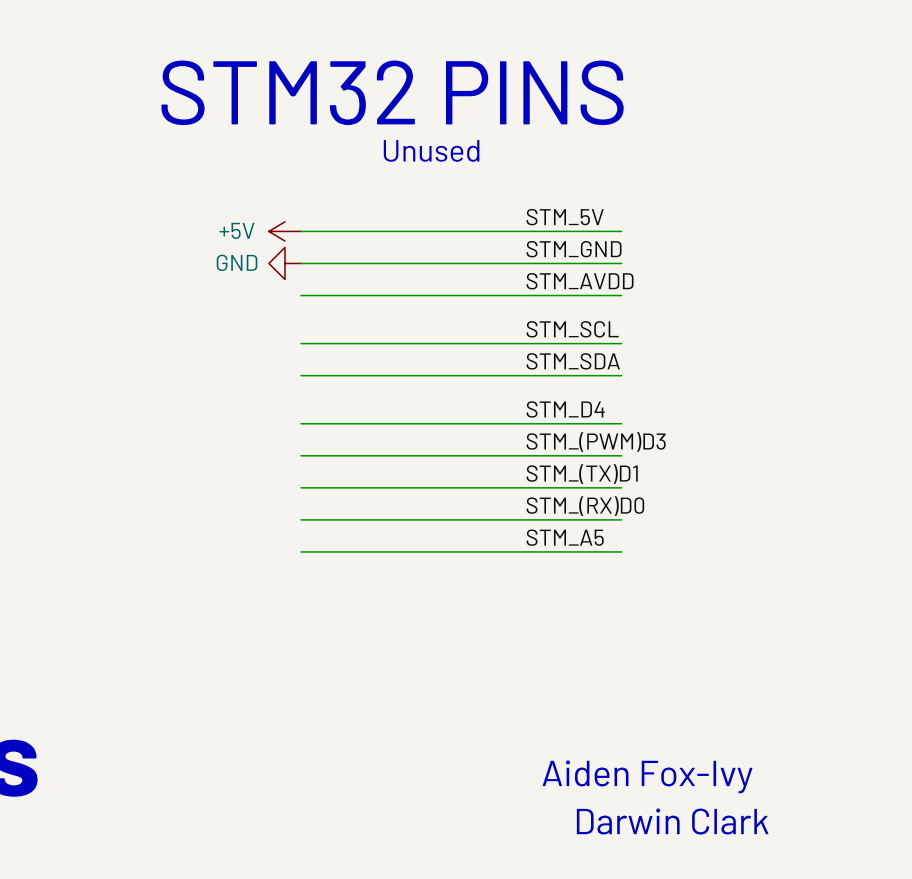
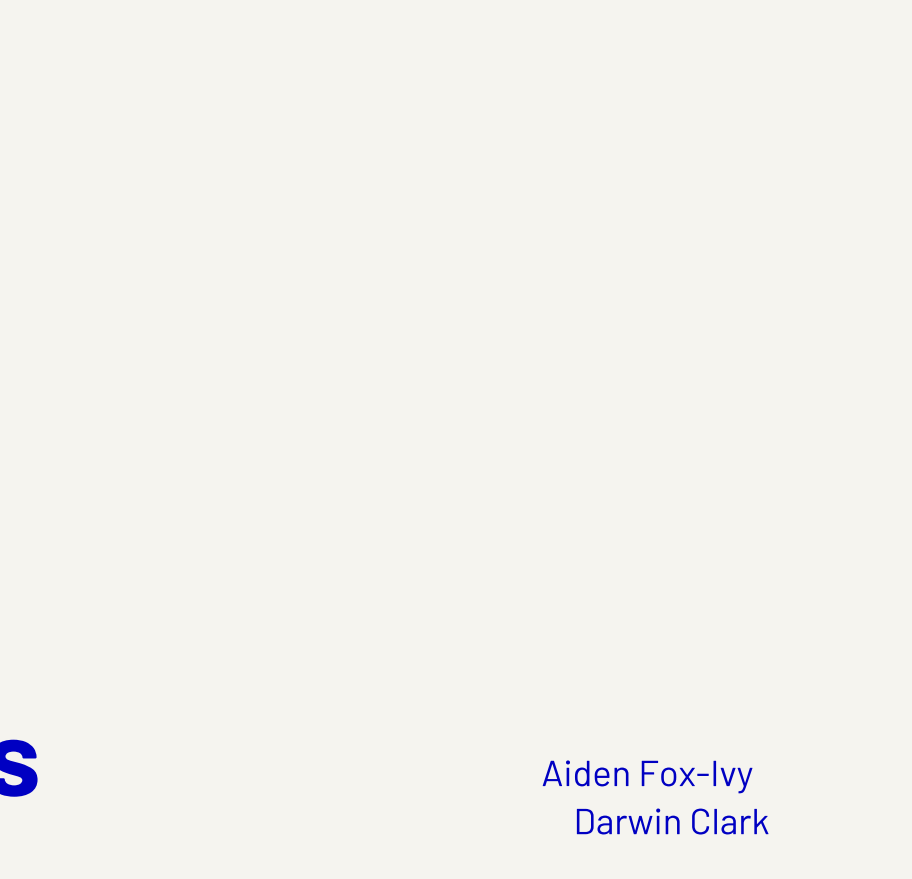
text: STM32 PINS (392, 92) -> none
text: Unused (431, 150) -> none
label: STM_5V (565, 217) -> none
power symbol: +5V (284, 231) -> none
wire: (301, 231) (621, 231) -> none
label: STM_GND (574, 249) -> none
power symbol: GND (284, 263) -> none
wire: (301, 263) (621, 263) -> none
label: STM_AVDD (580, 281) -> none
wire: (301, 295) (621, 295) -> none
label: STM_SCL (572, 329) -> none
wire: (301, 343) (621, 343) -> none
label: STM_SDA (573, 361) -> none
wire: (301, 375) (621, 375) -> none
label: STM_D4 (565, 409) -> none
wire: (301, 423) (621, 423) -> none
label: STM_(PWM)D3 (596, 441) -> none
wire: (301, 455) (621, 455) -> none
label: STM_(TX)D1 (582, 474) -> none
wire: (301, 487) (621, 487) -> none
label: STM_(RX)D0 (585, 506) -> none
wire: (301, 519) (621, 519) -> none
label: STM_A5 (565, 537) -> none
wire: (301, 551) (621, 551) -> none

